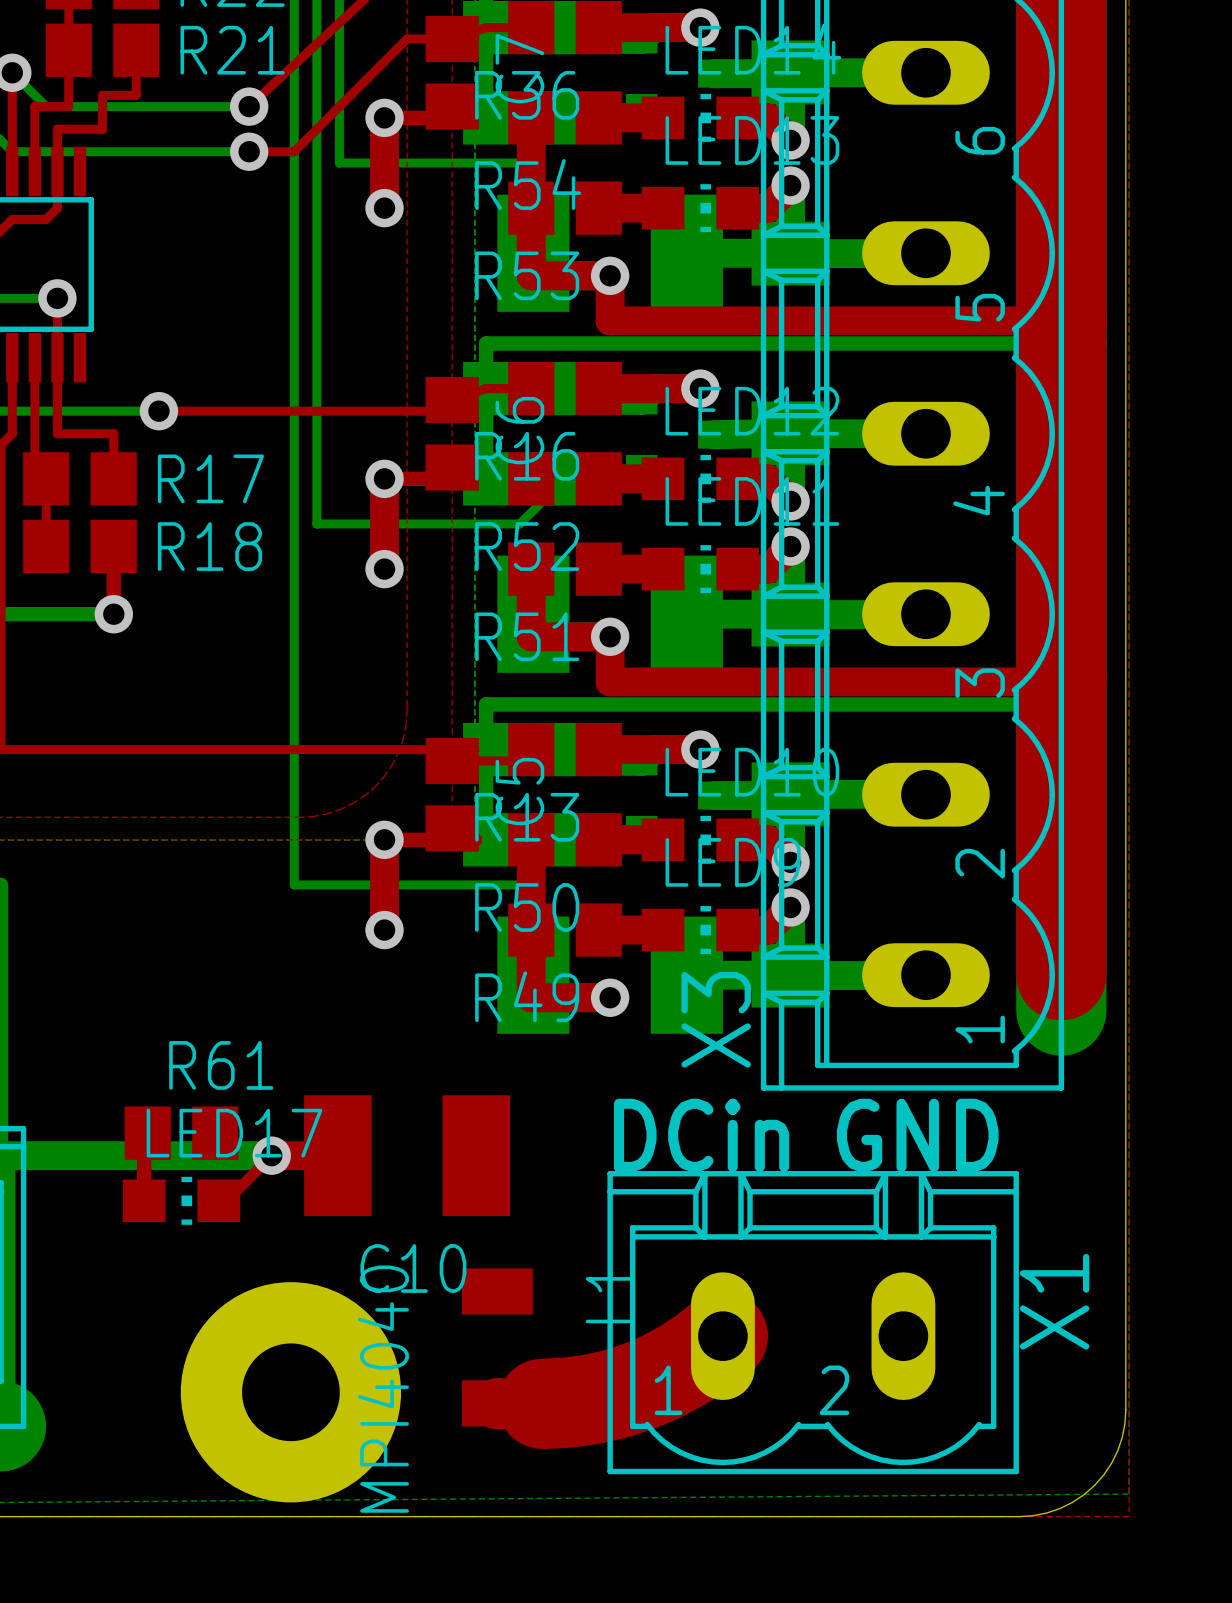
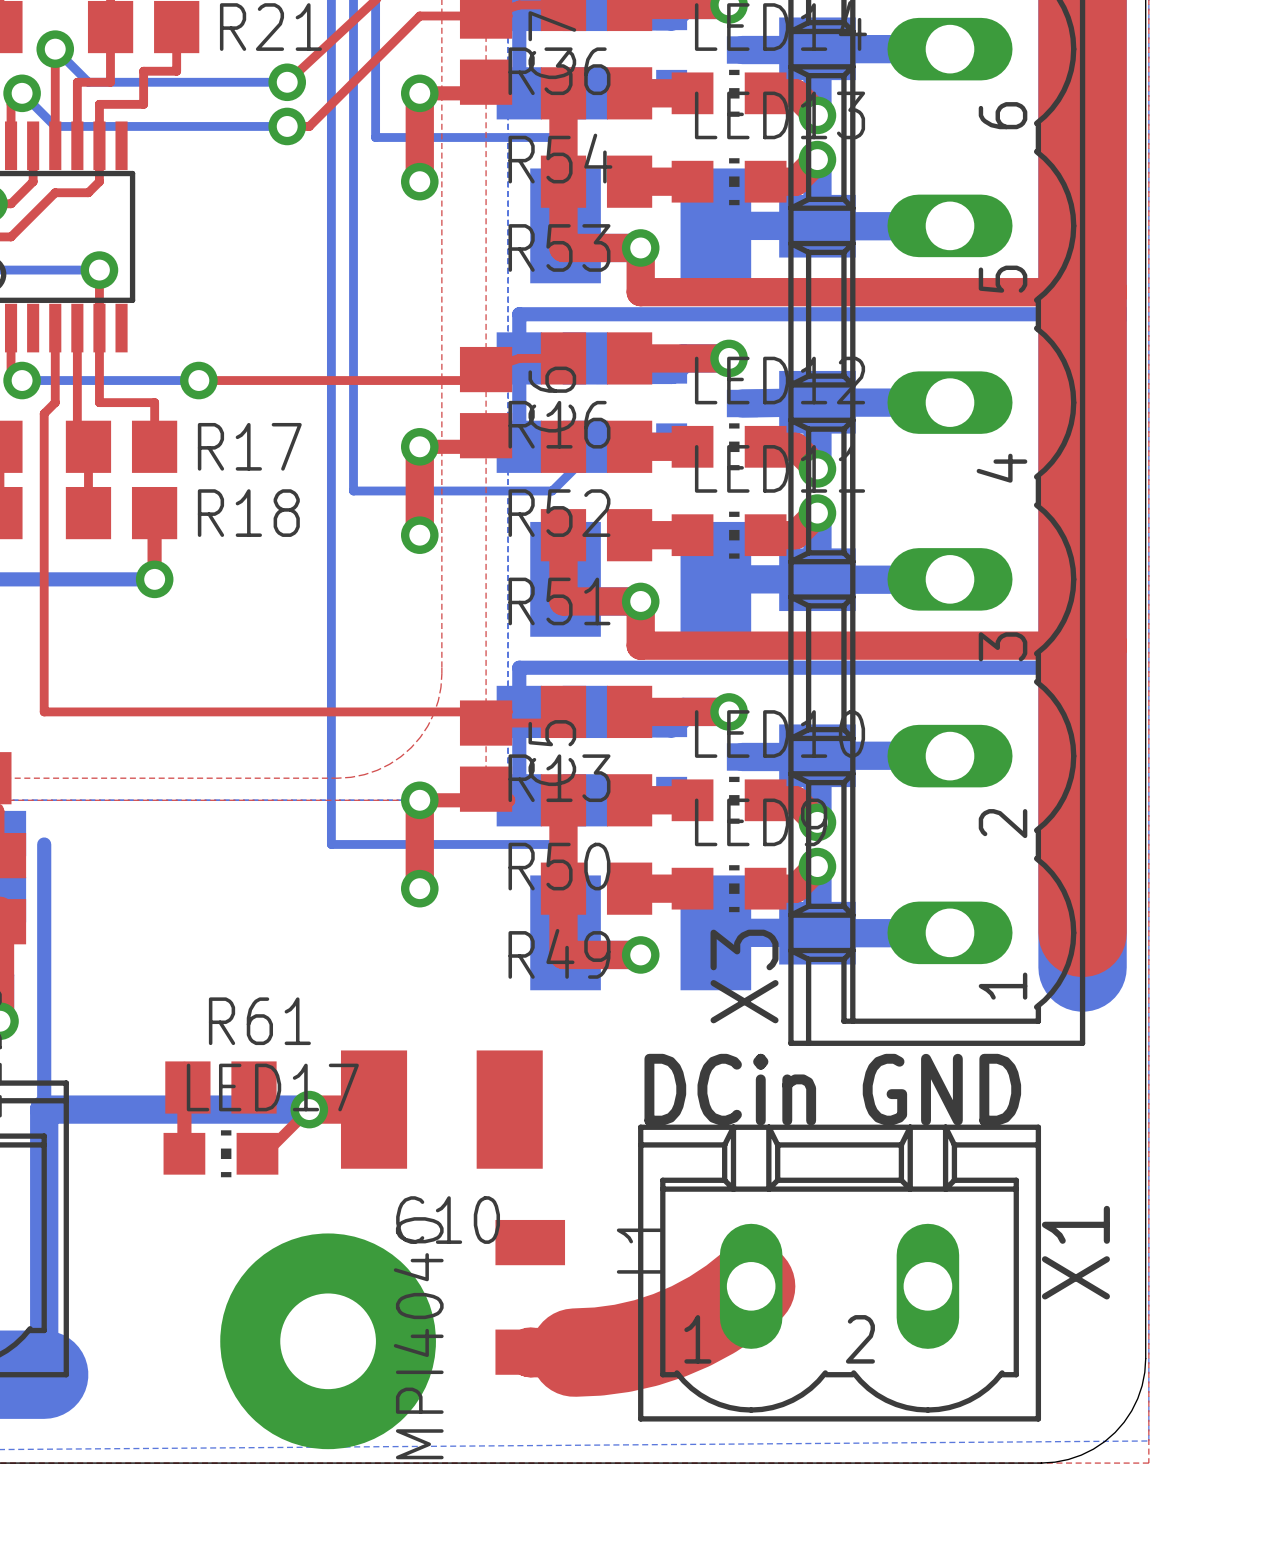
top track: (407, 38) (294, 151) (271, 151) -> (441, 16) (419, 16) (309, 126)

